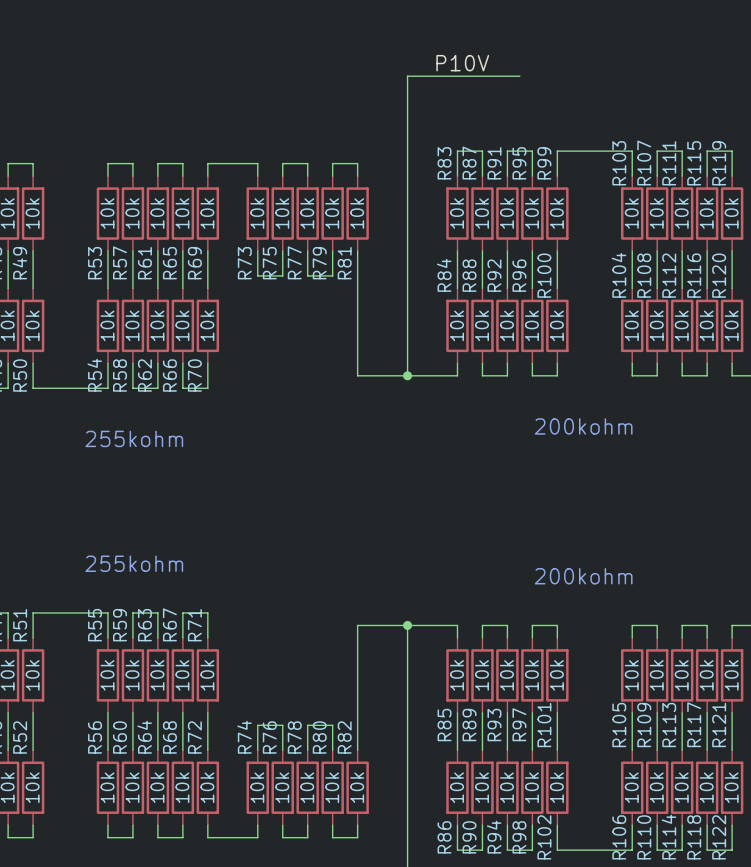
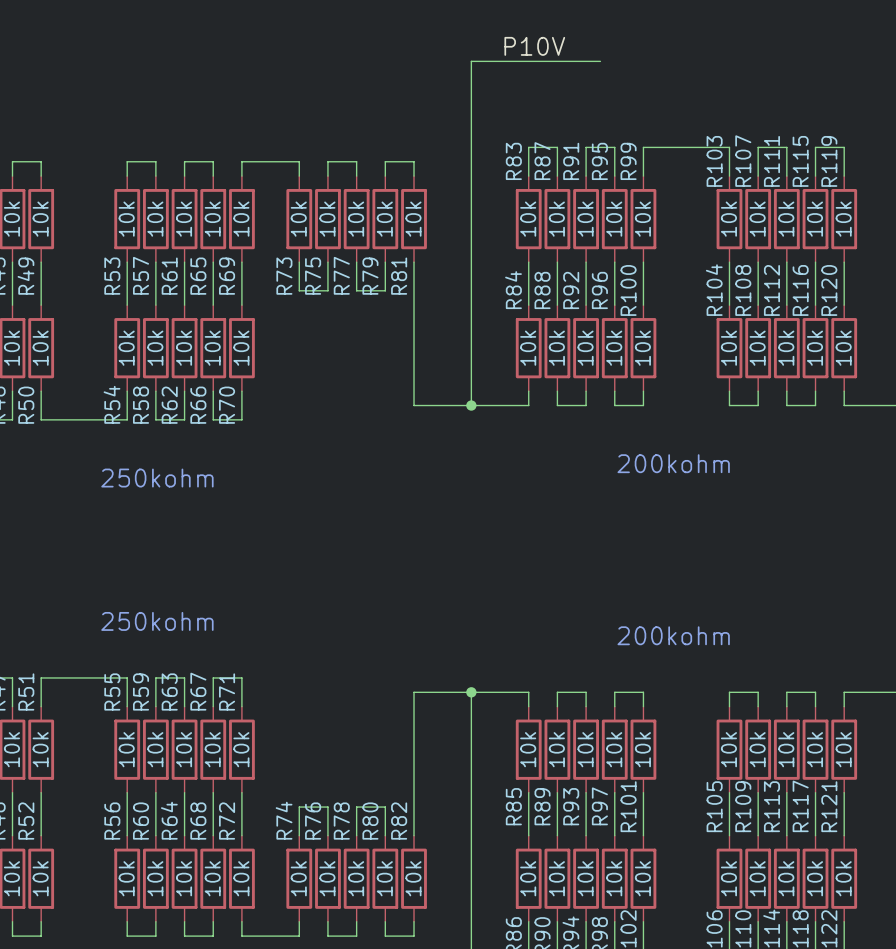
text: 255kohm (134, 438) -> 250kohm (157, 478)
text: 255kohm (134, 563) -> 250kohm (157, 621)

